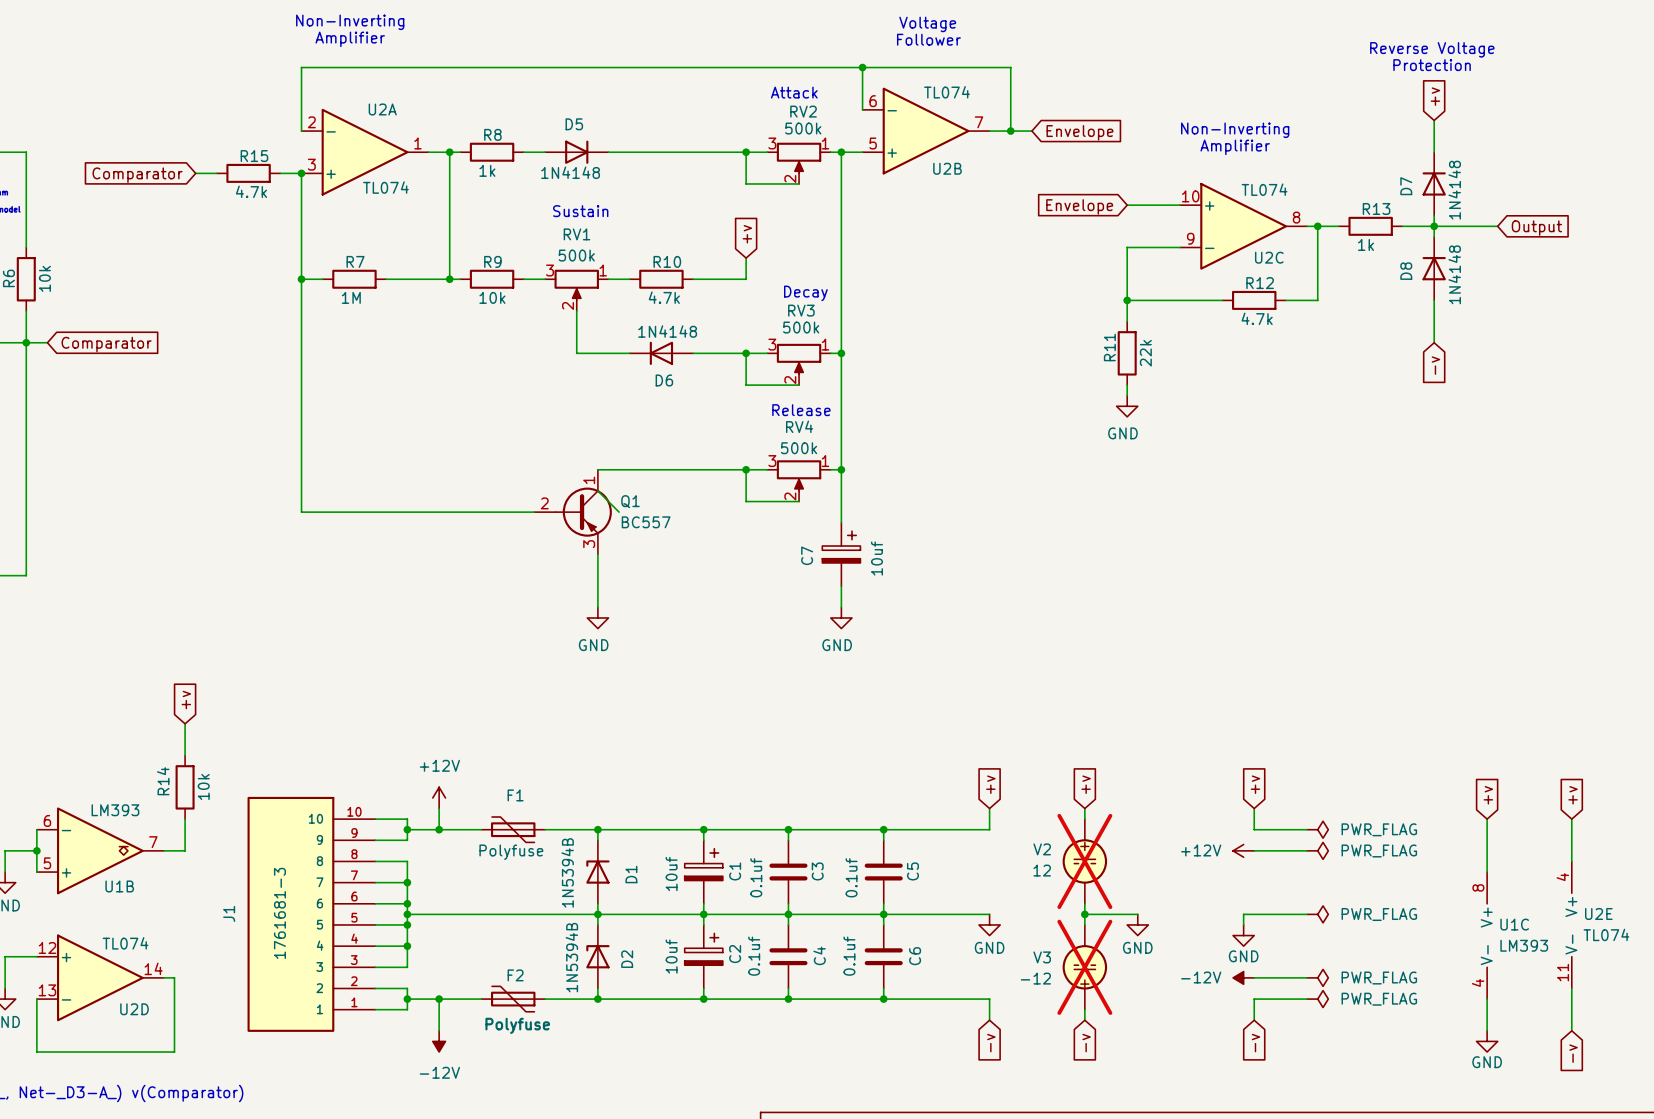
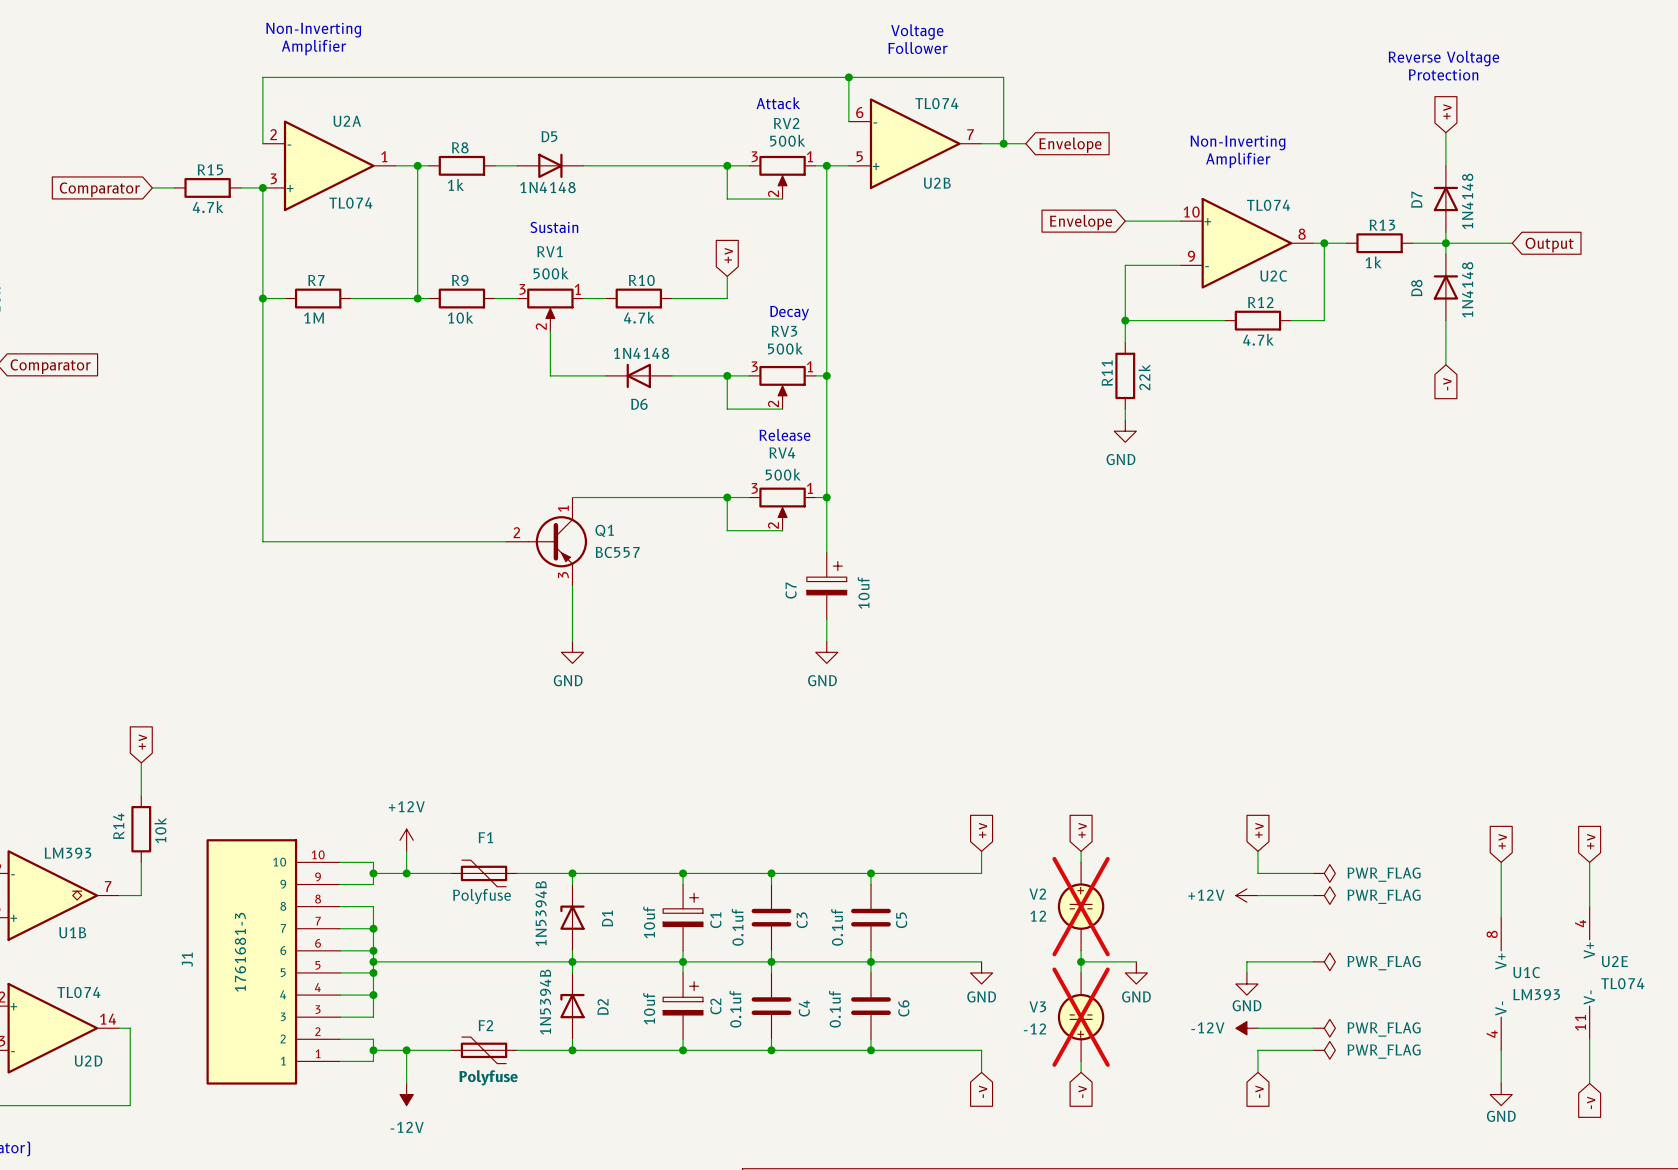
wire: (597, 490) (619, 512) -> none

